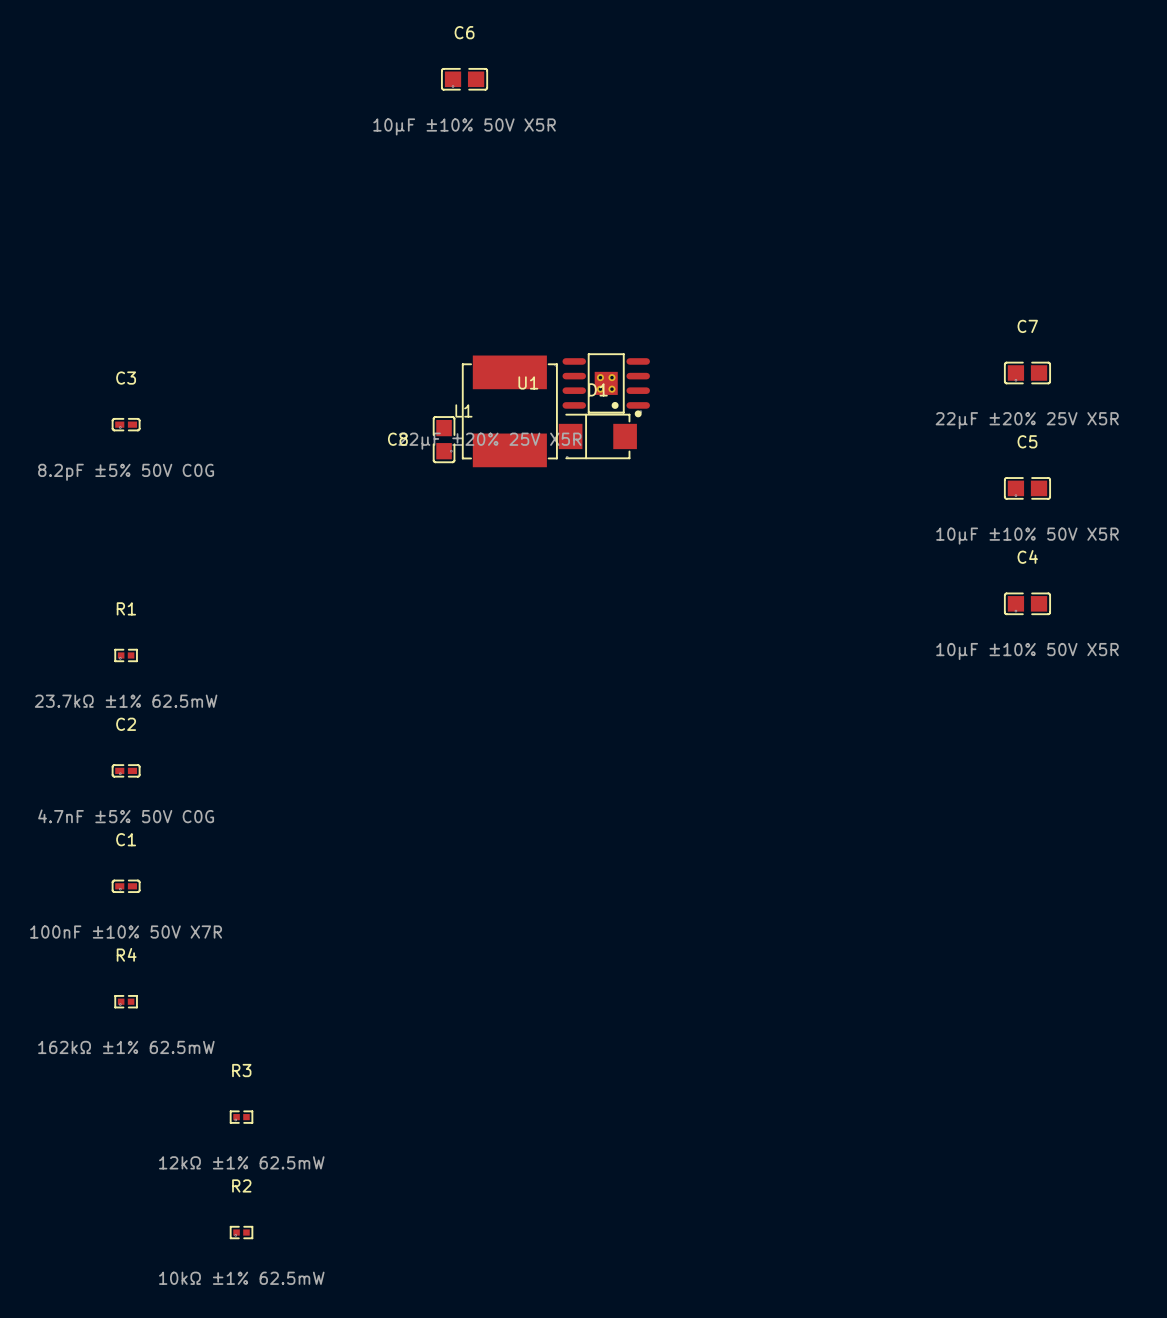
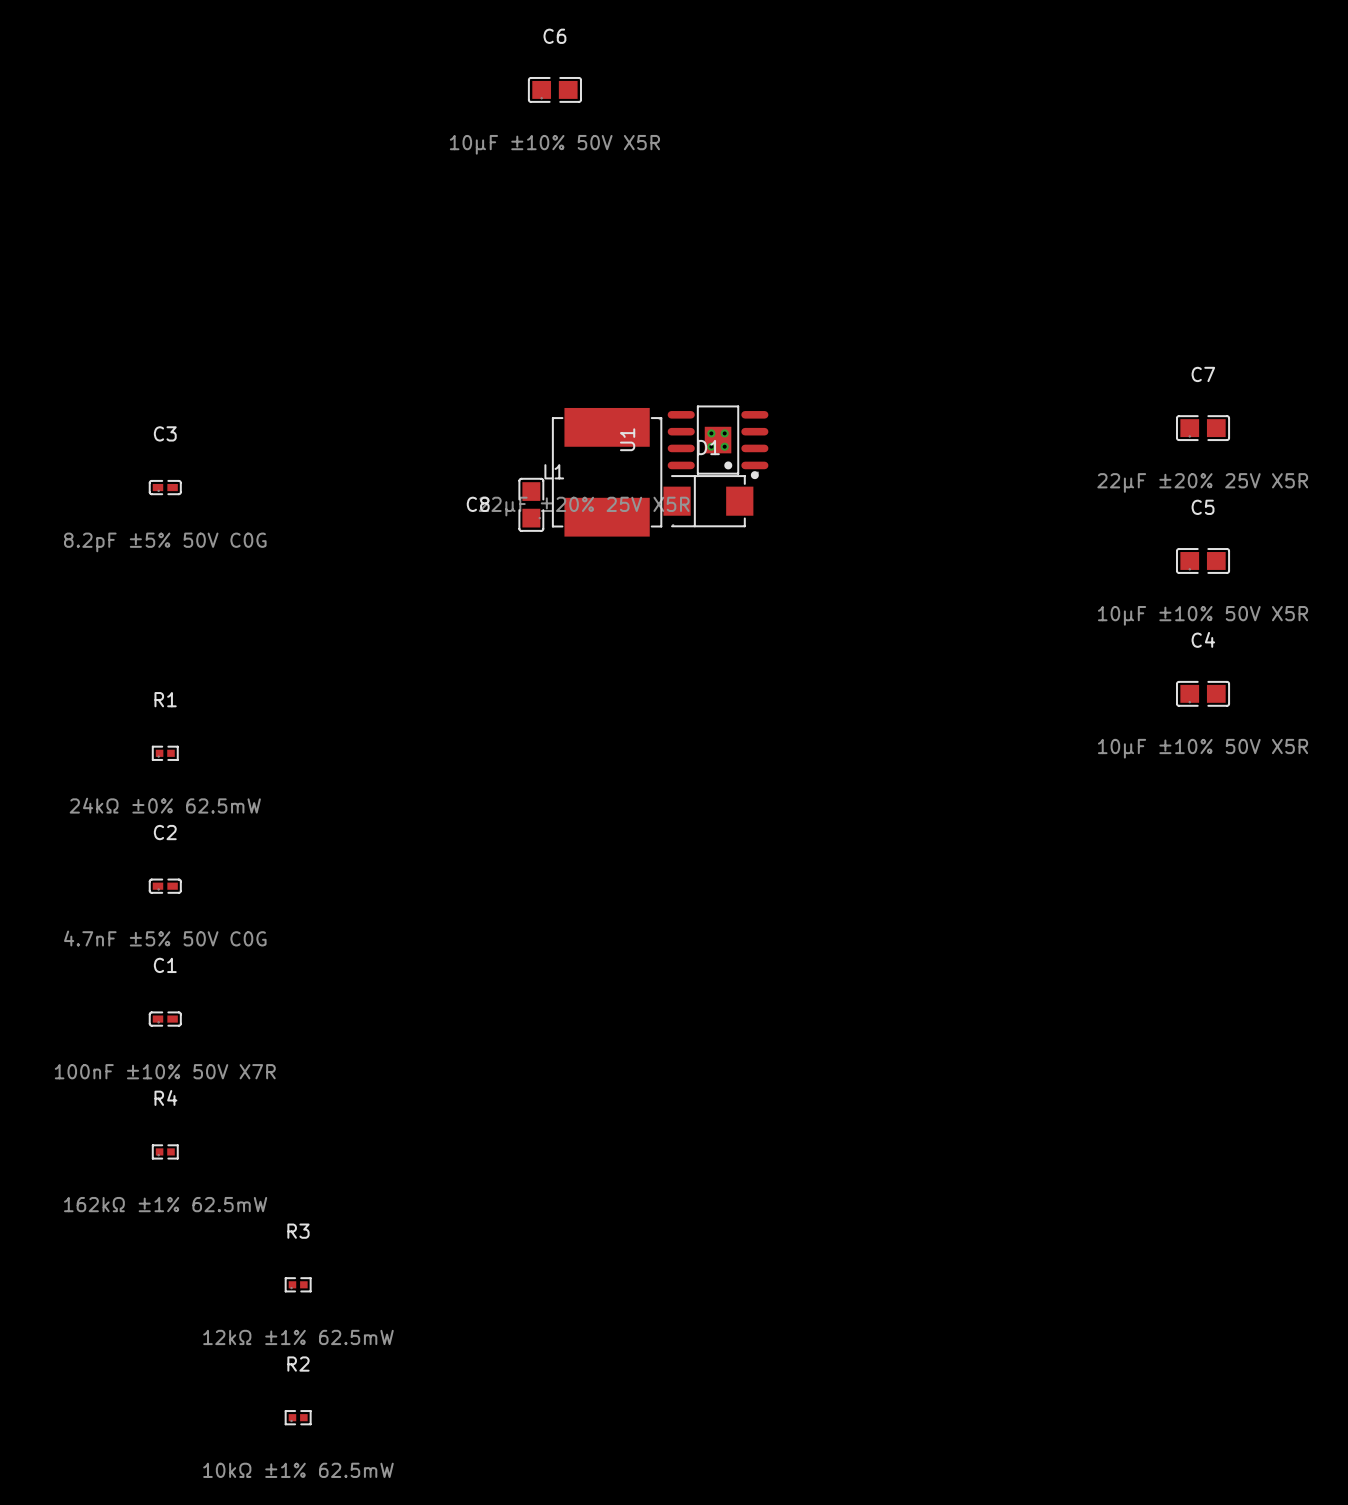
U1 name rotation: 0° (528, 382) -> 90° counterclockwise (627, 439)
R1 value: 23.7kΩ ±1% 62.5mW (126, 701) -> 24kΩ ±0% 62.5mW (165, 805)

